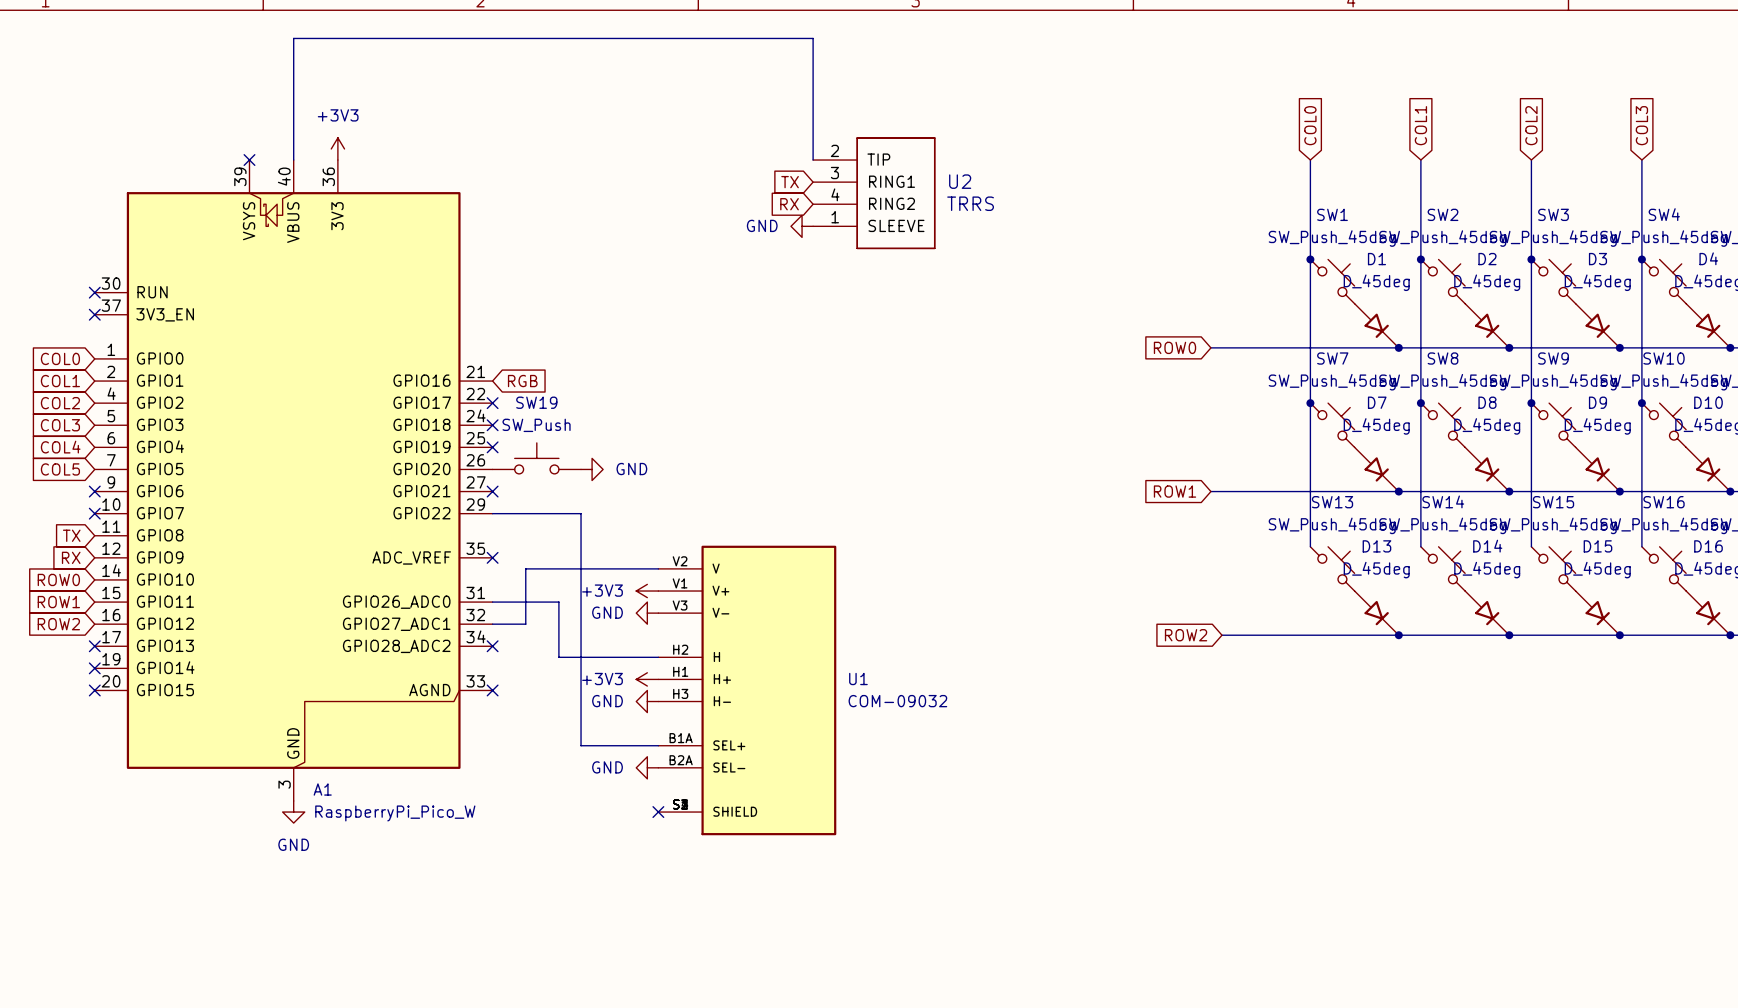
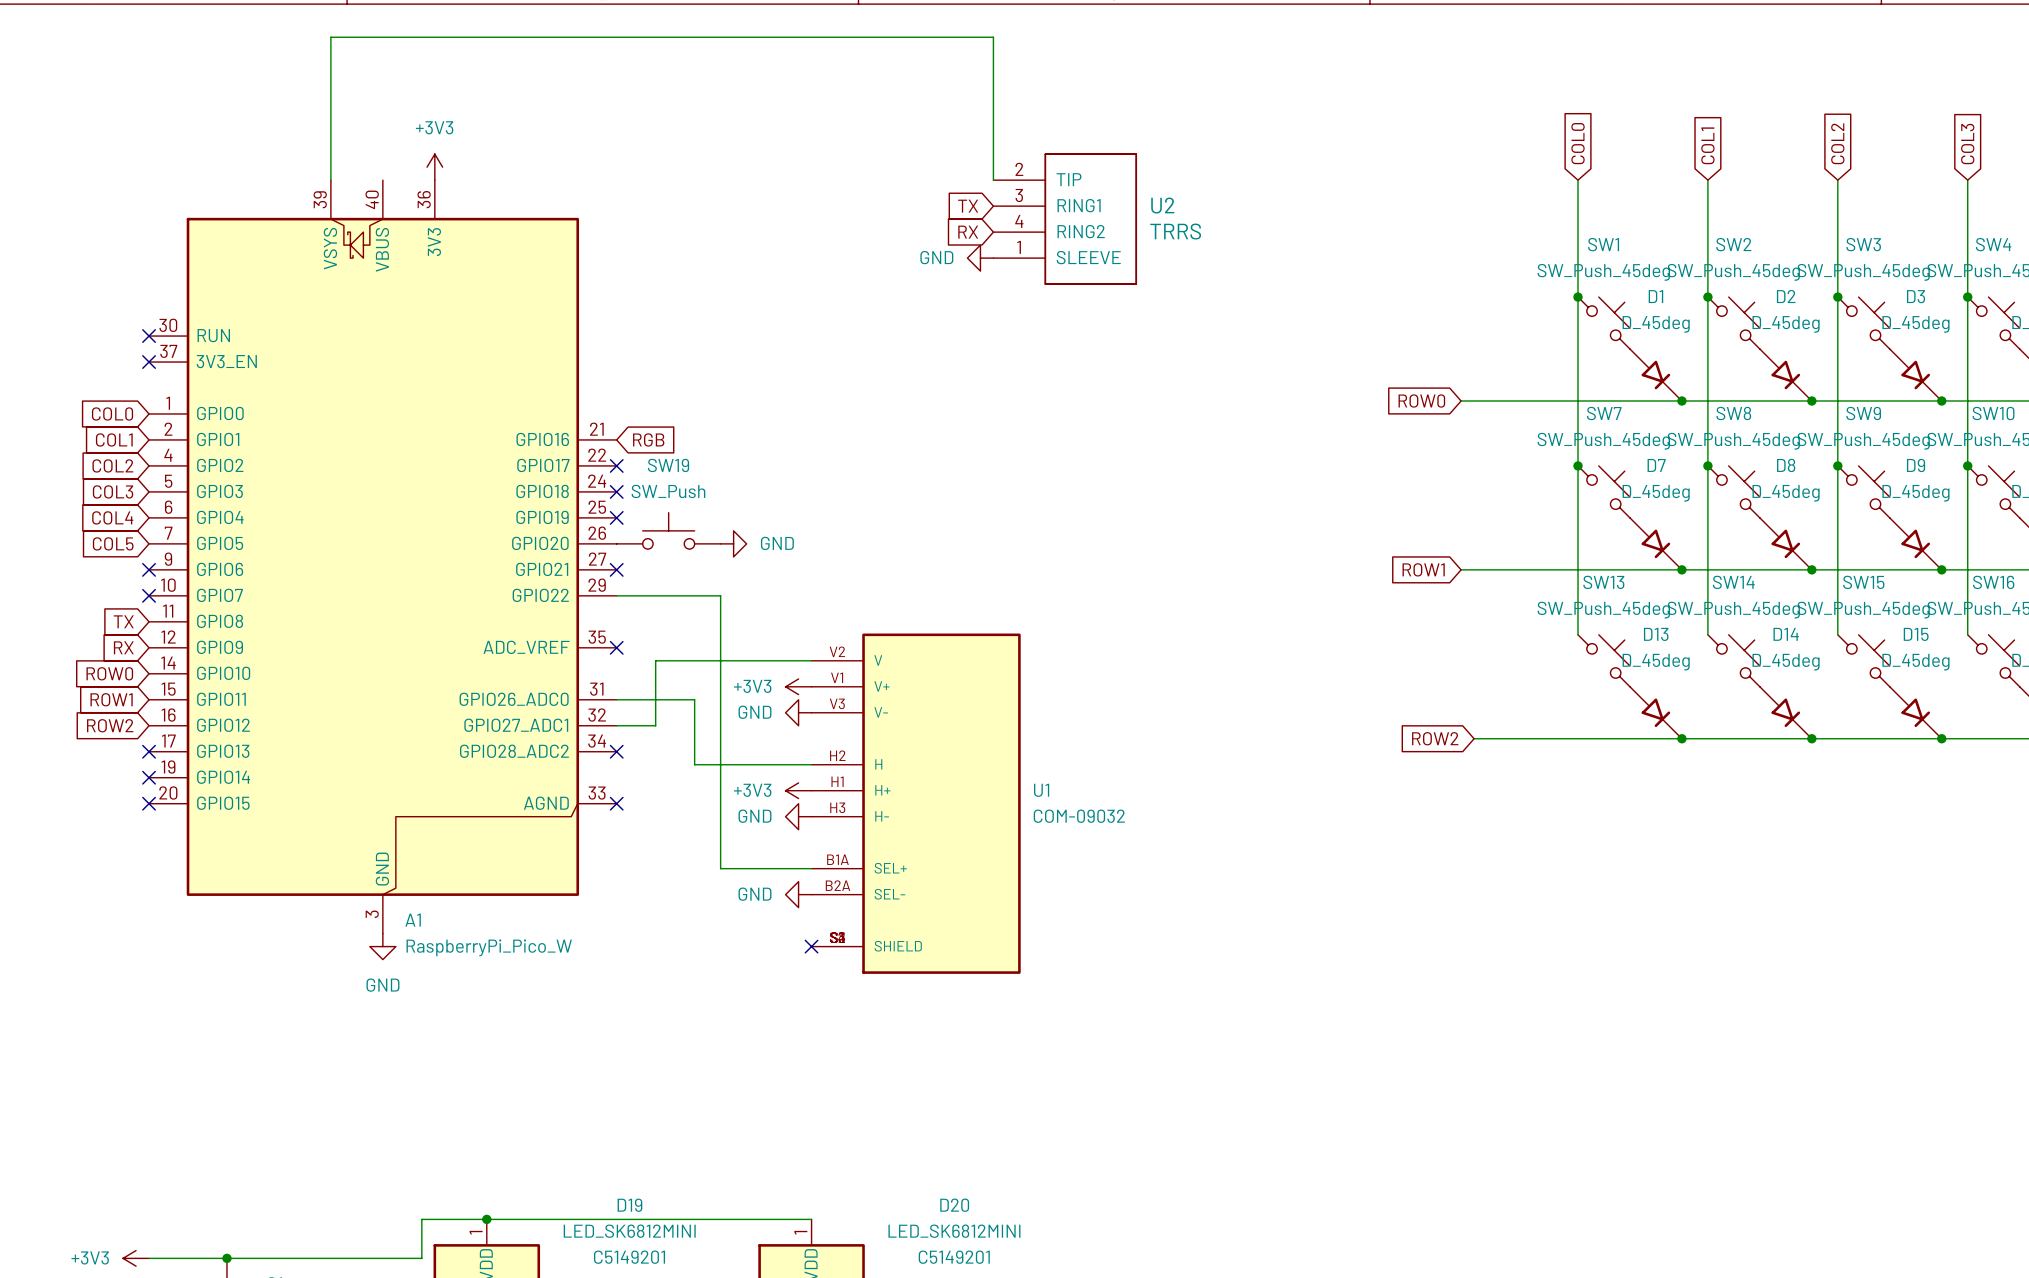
wire: (293, 38) (293, 160) -> (382, 37) (330, 37) (330, 180)
no-connect mark: (249, 160) -> none

